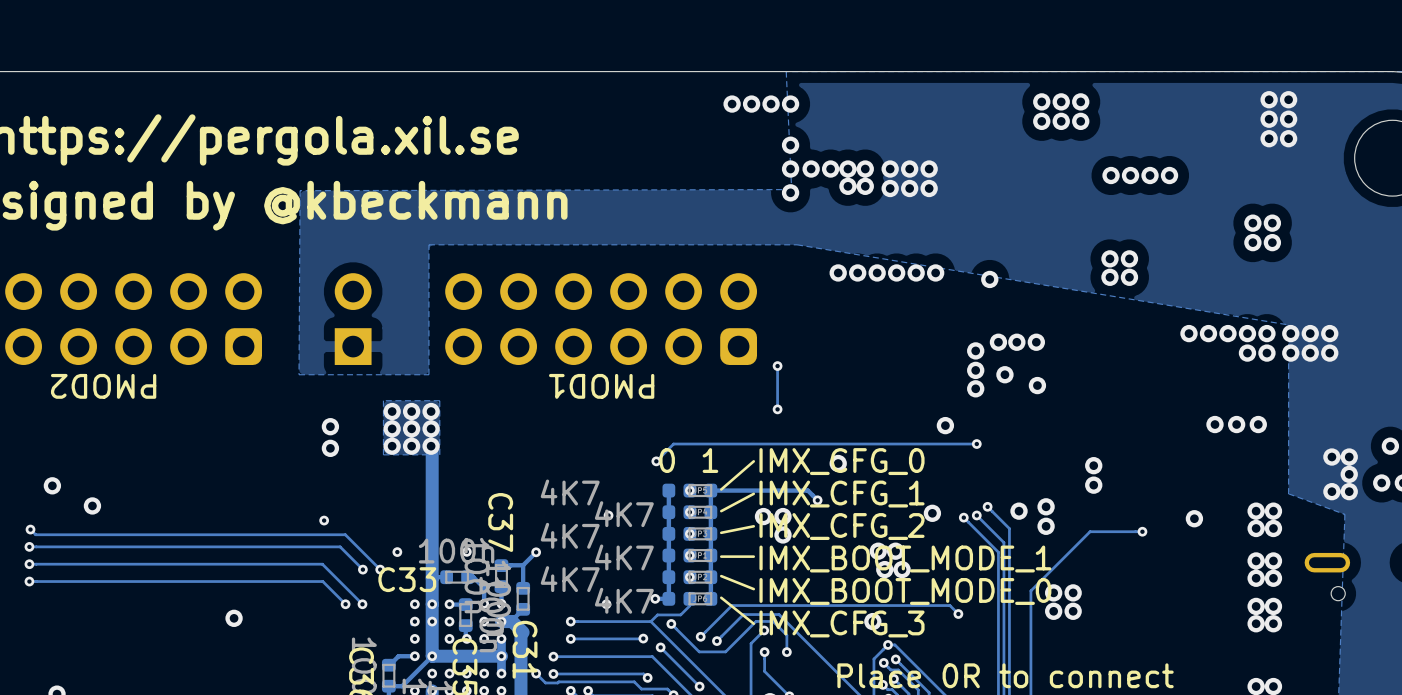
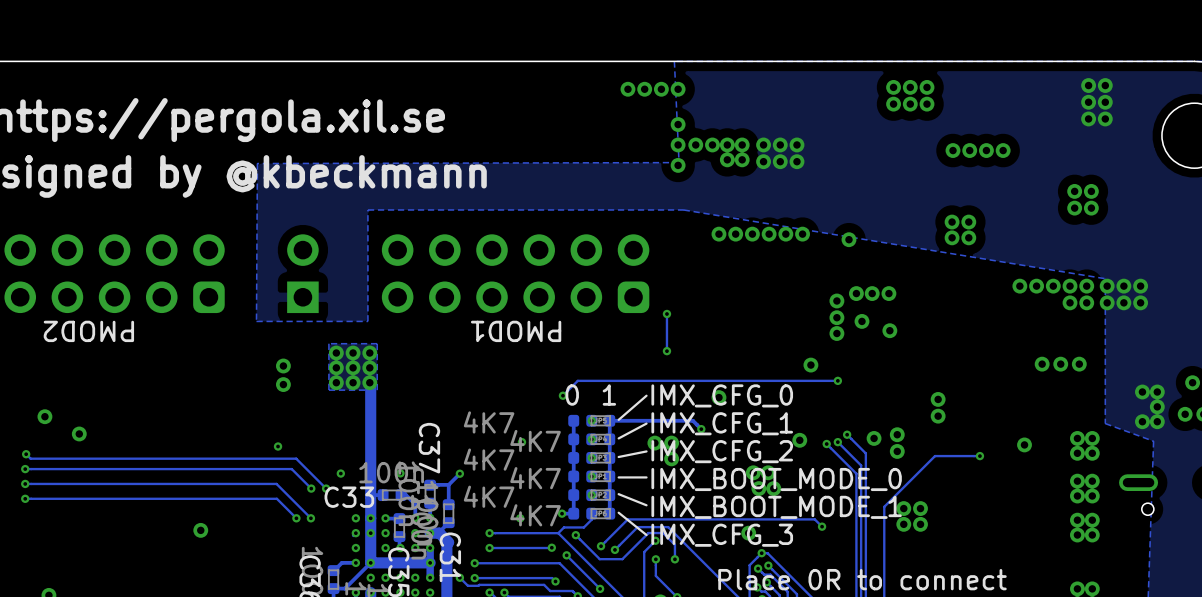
text: IMX_BOOT_MODE_1 (905, 559) -> IMX_BOOT_MODE_0 (776, 479)
text: IMX_BOOT_MODE_0 (905, 591) -> IMX_BOOT_MODE_1 (776, 507)

